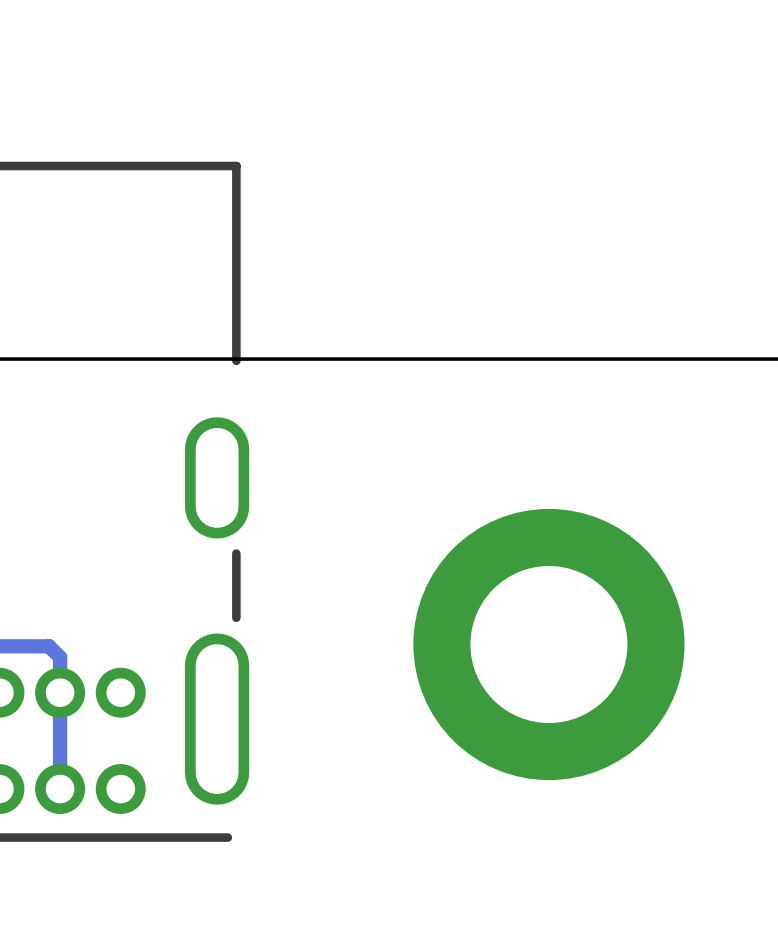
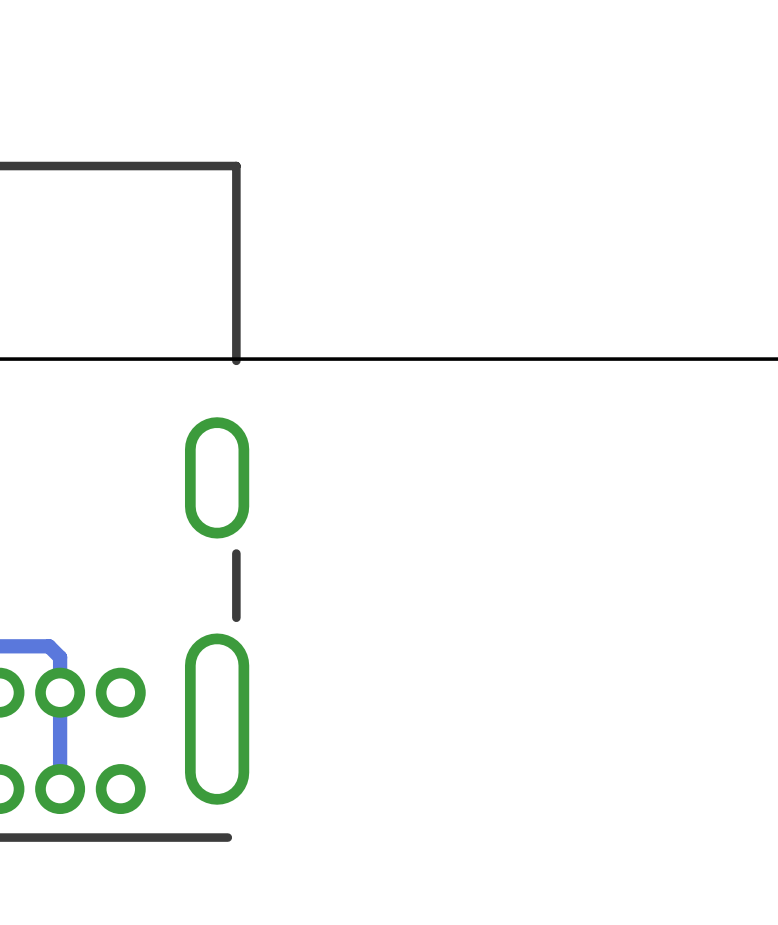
part: (548, 644) -> none

